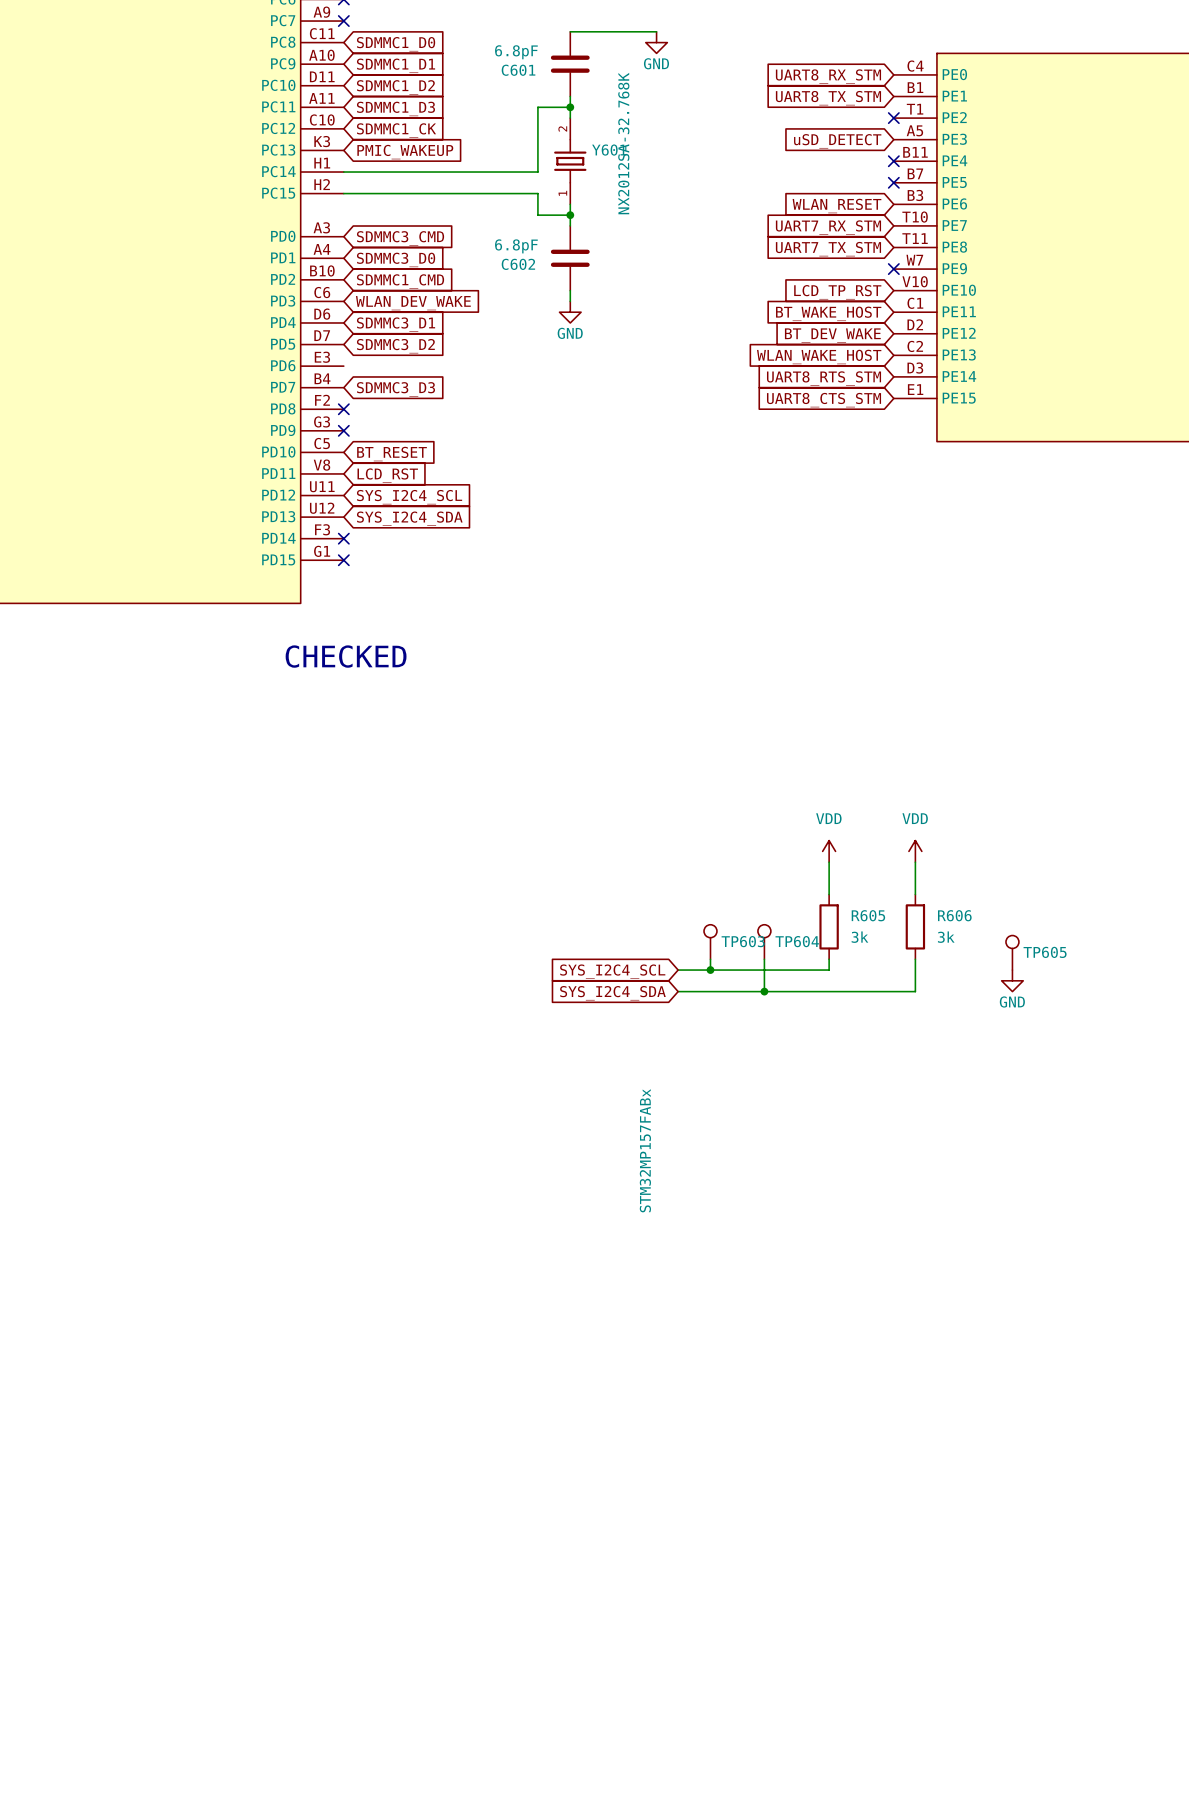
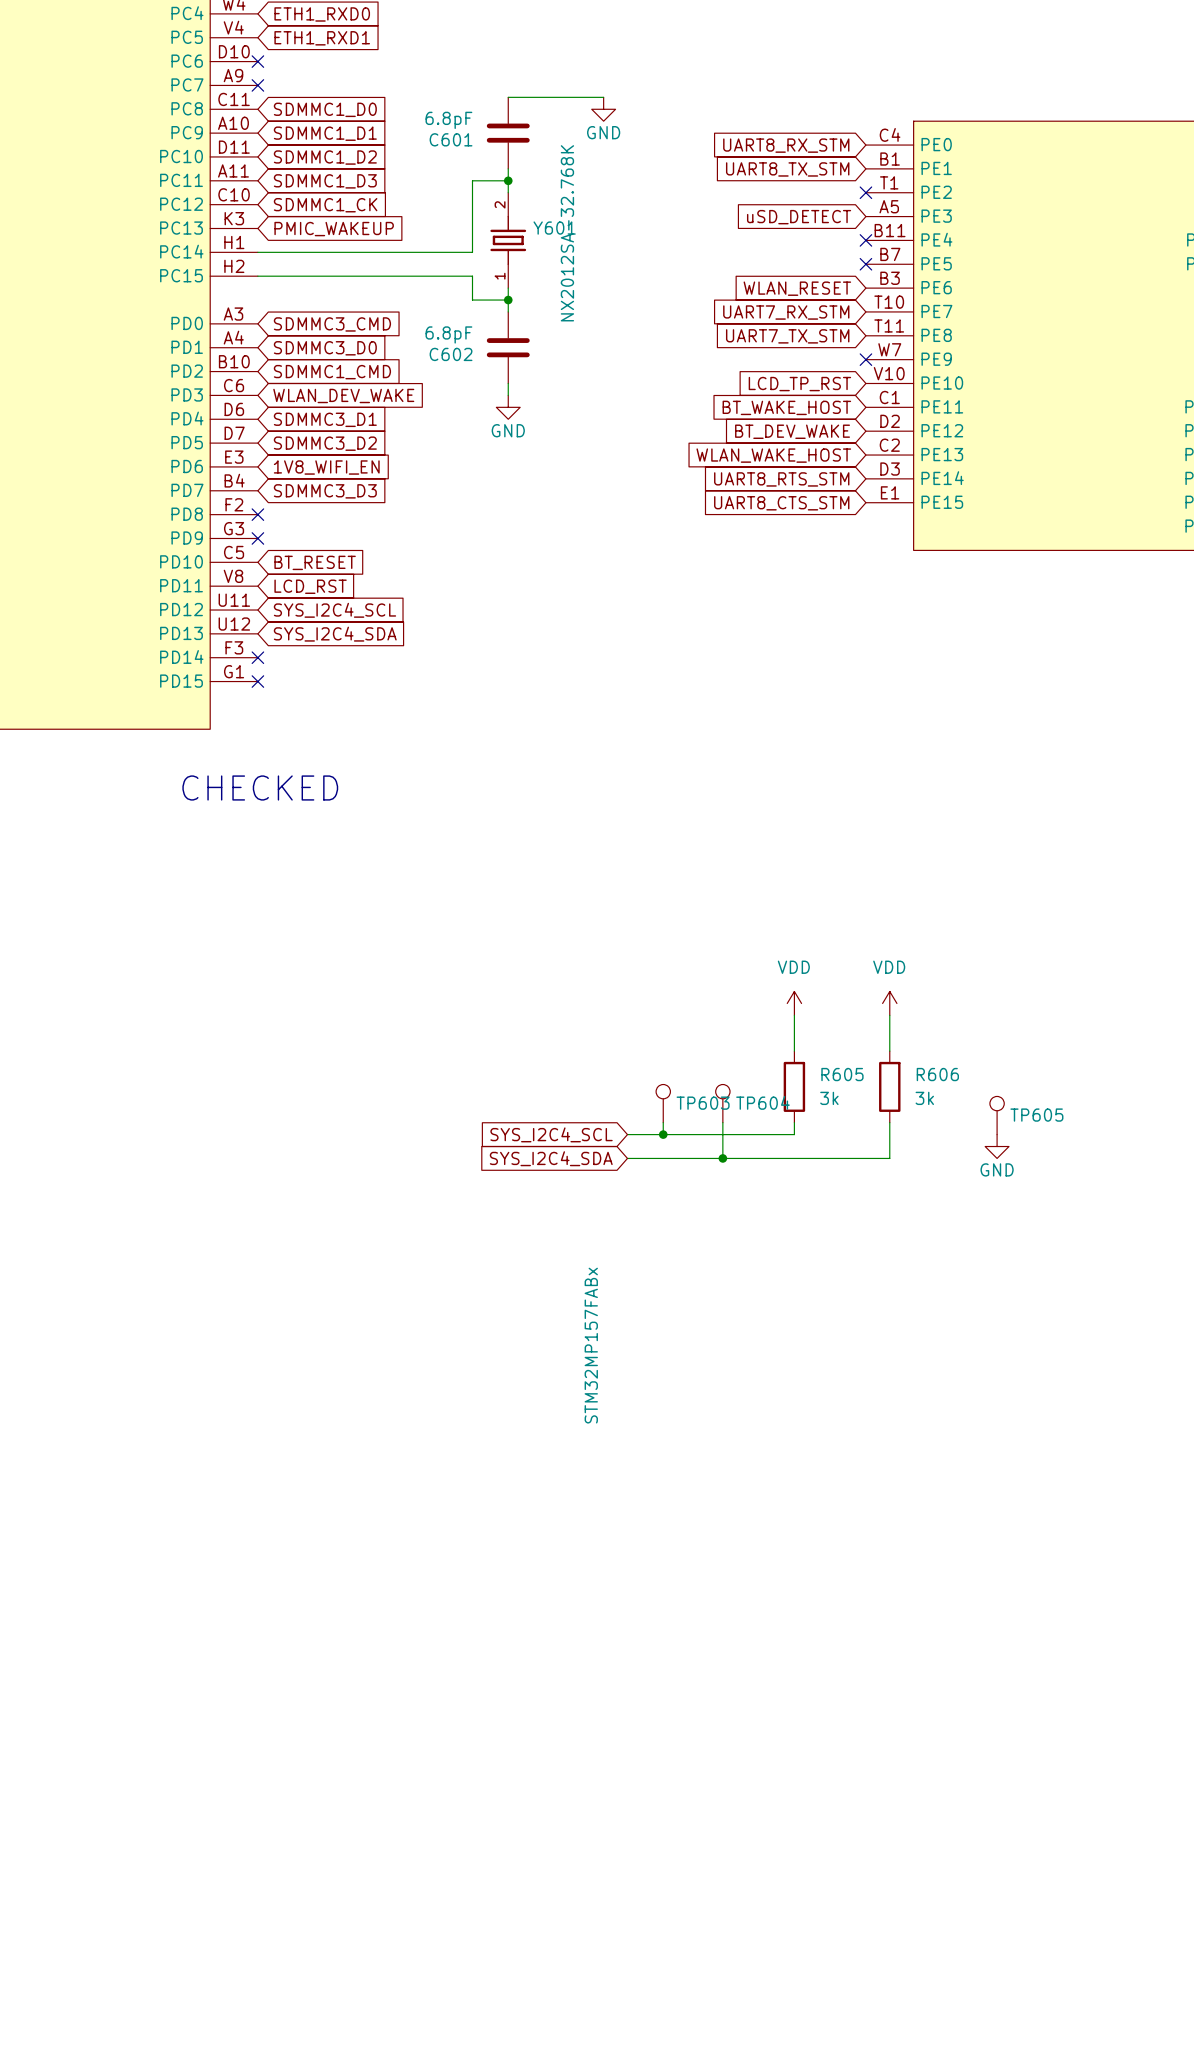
global label: none -> 1V8_WIFI_EN (326, 467)

